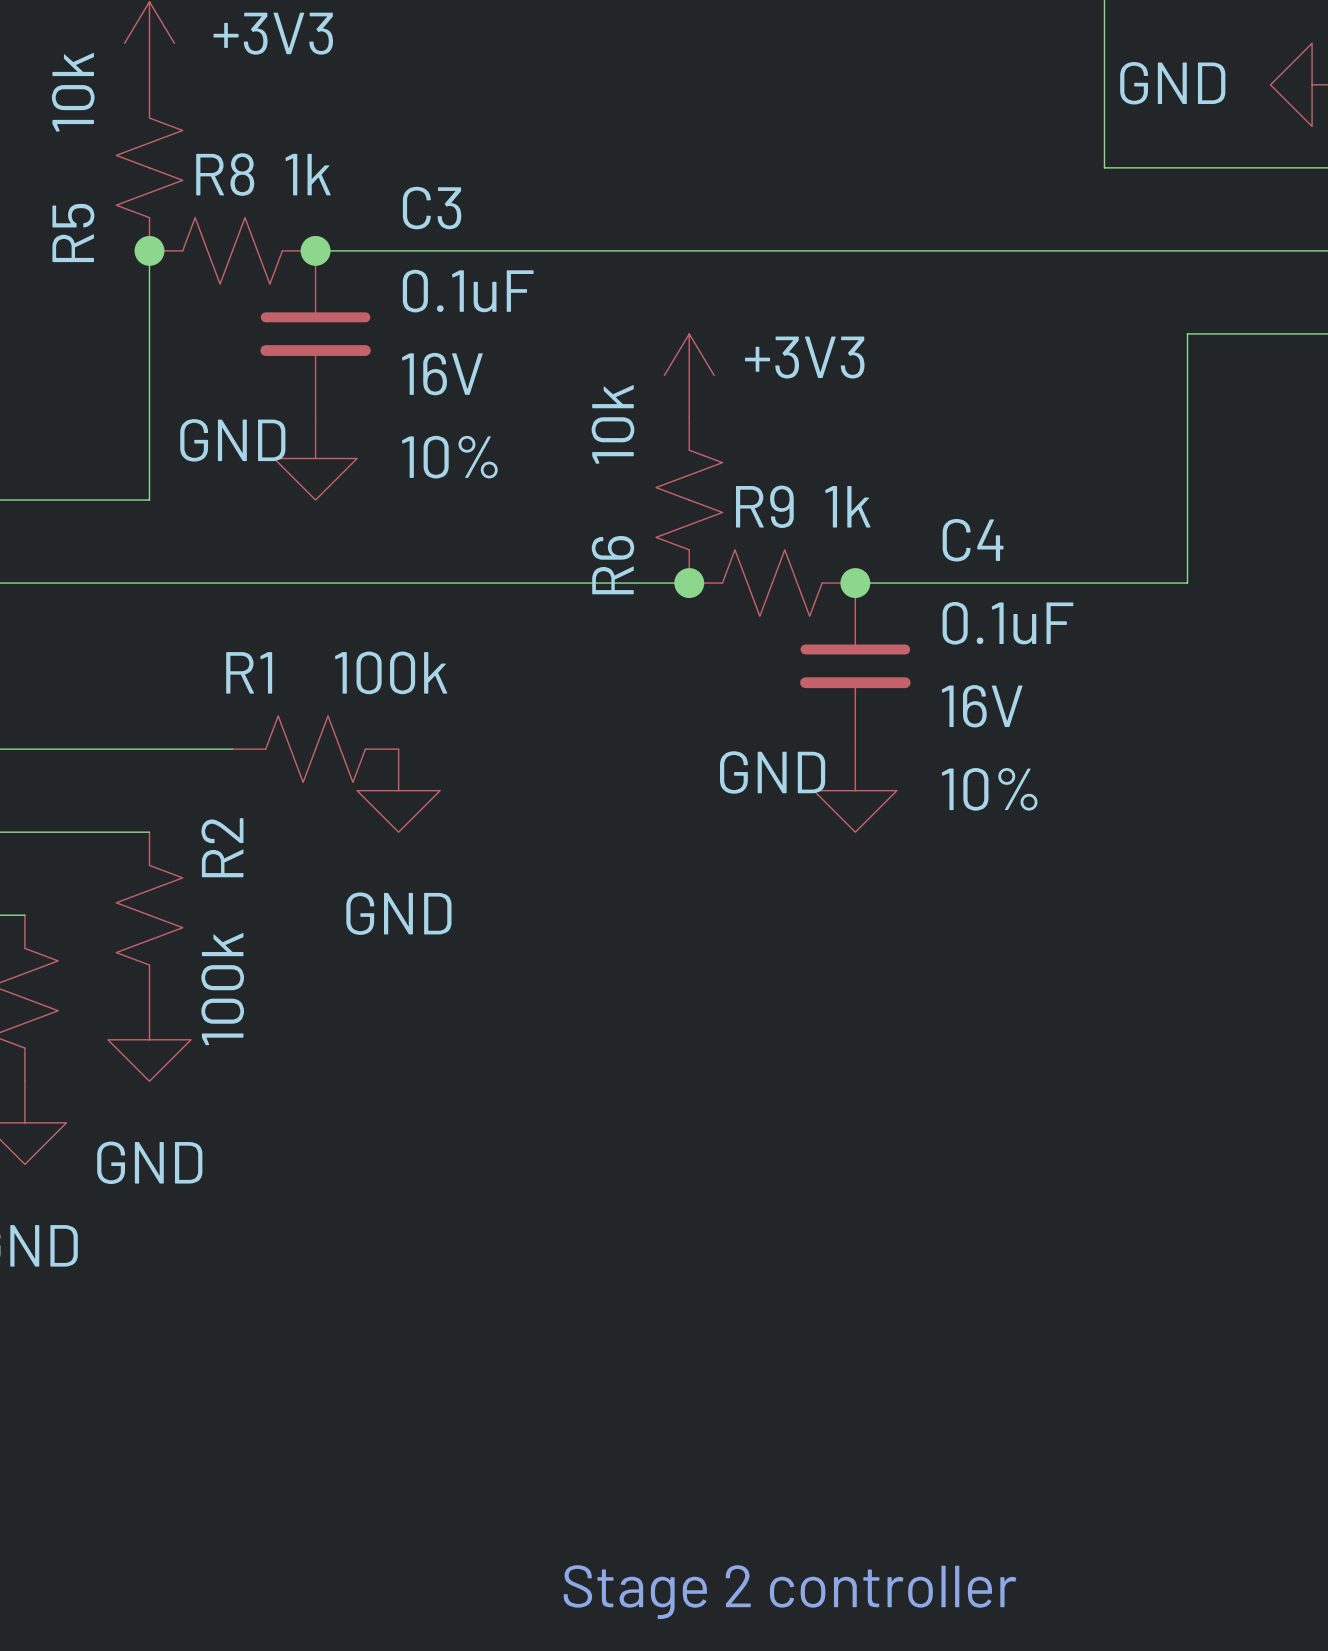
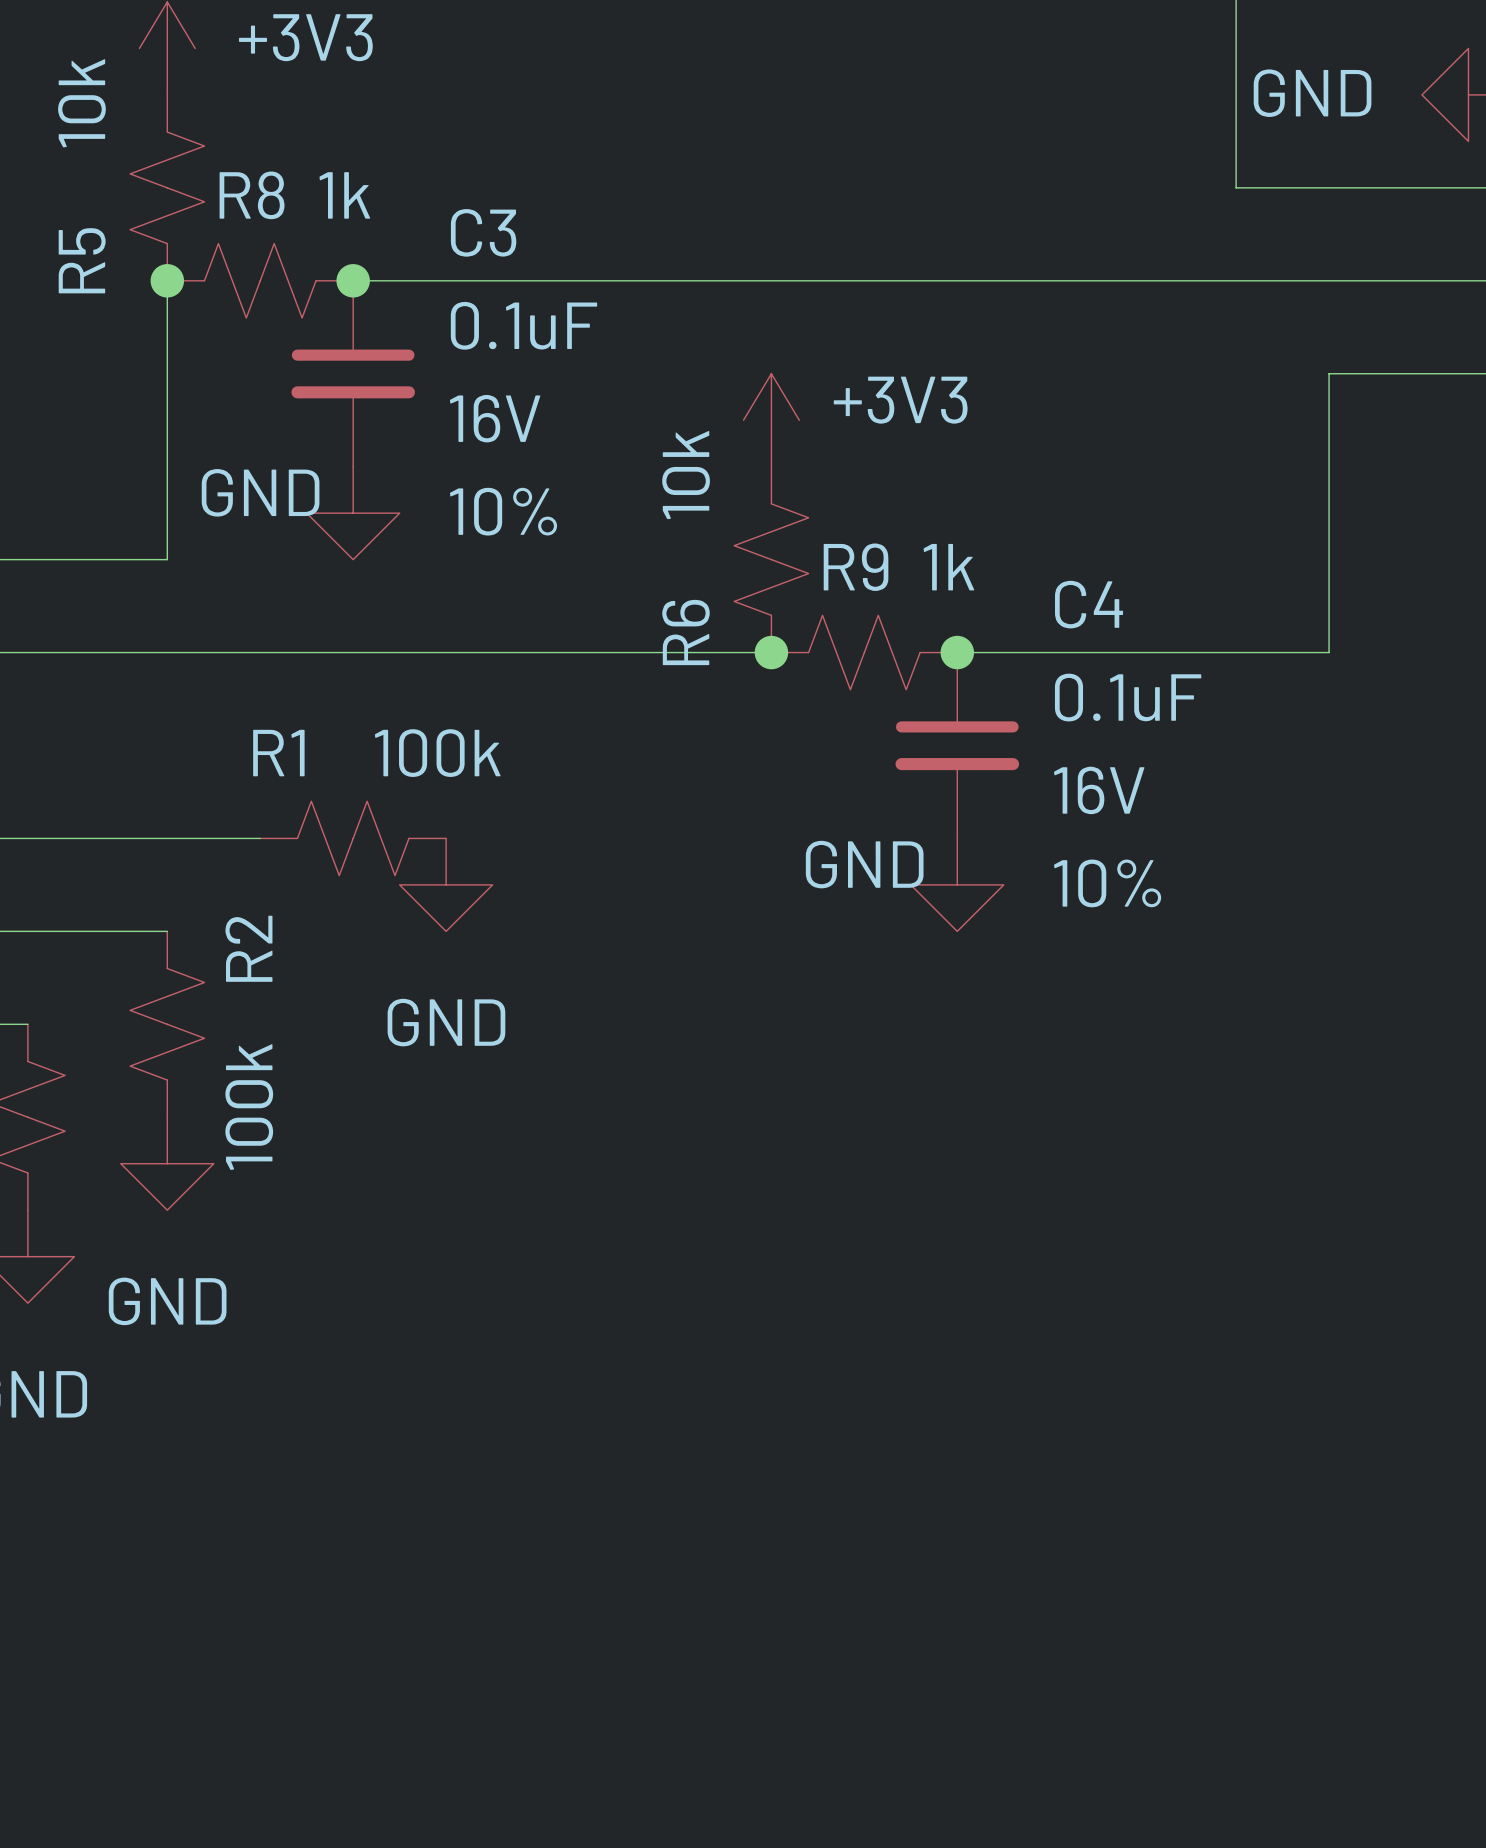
text: Stage 2 controller (790, 1592) -> none

